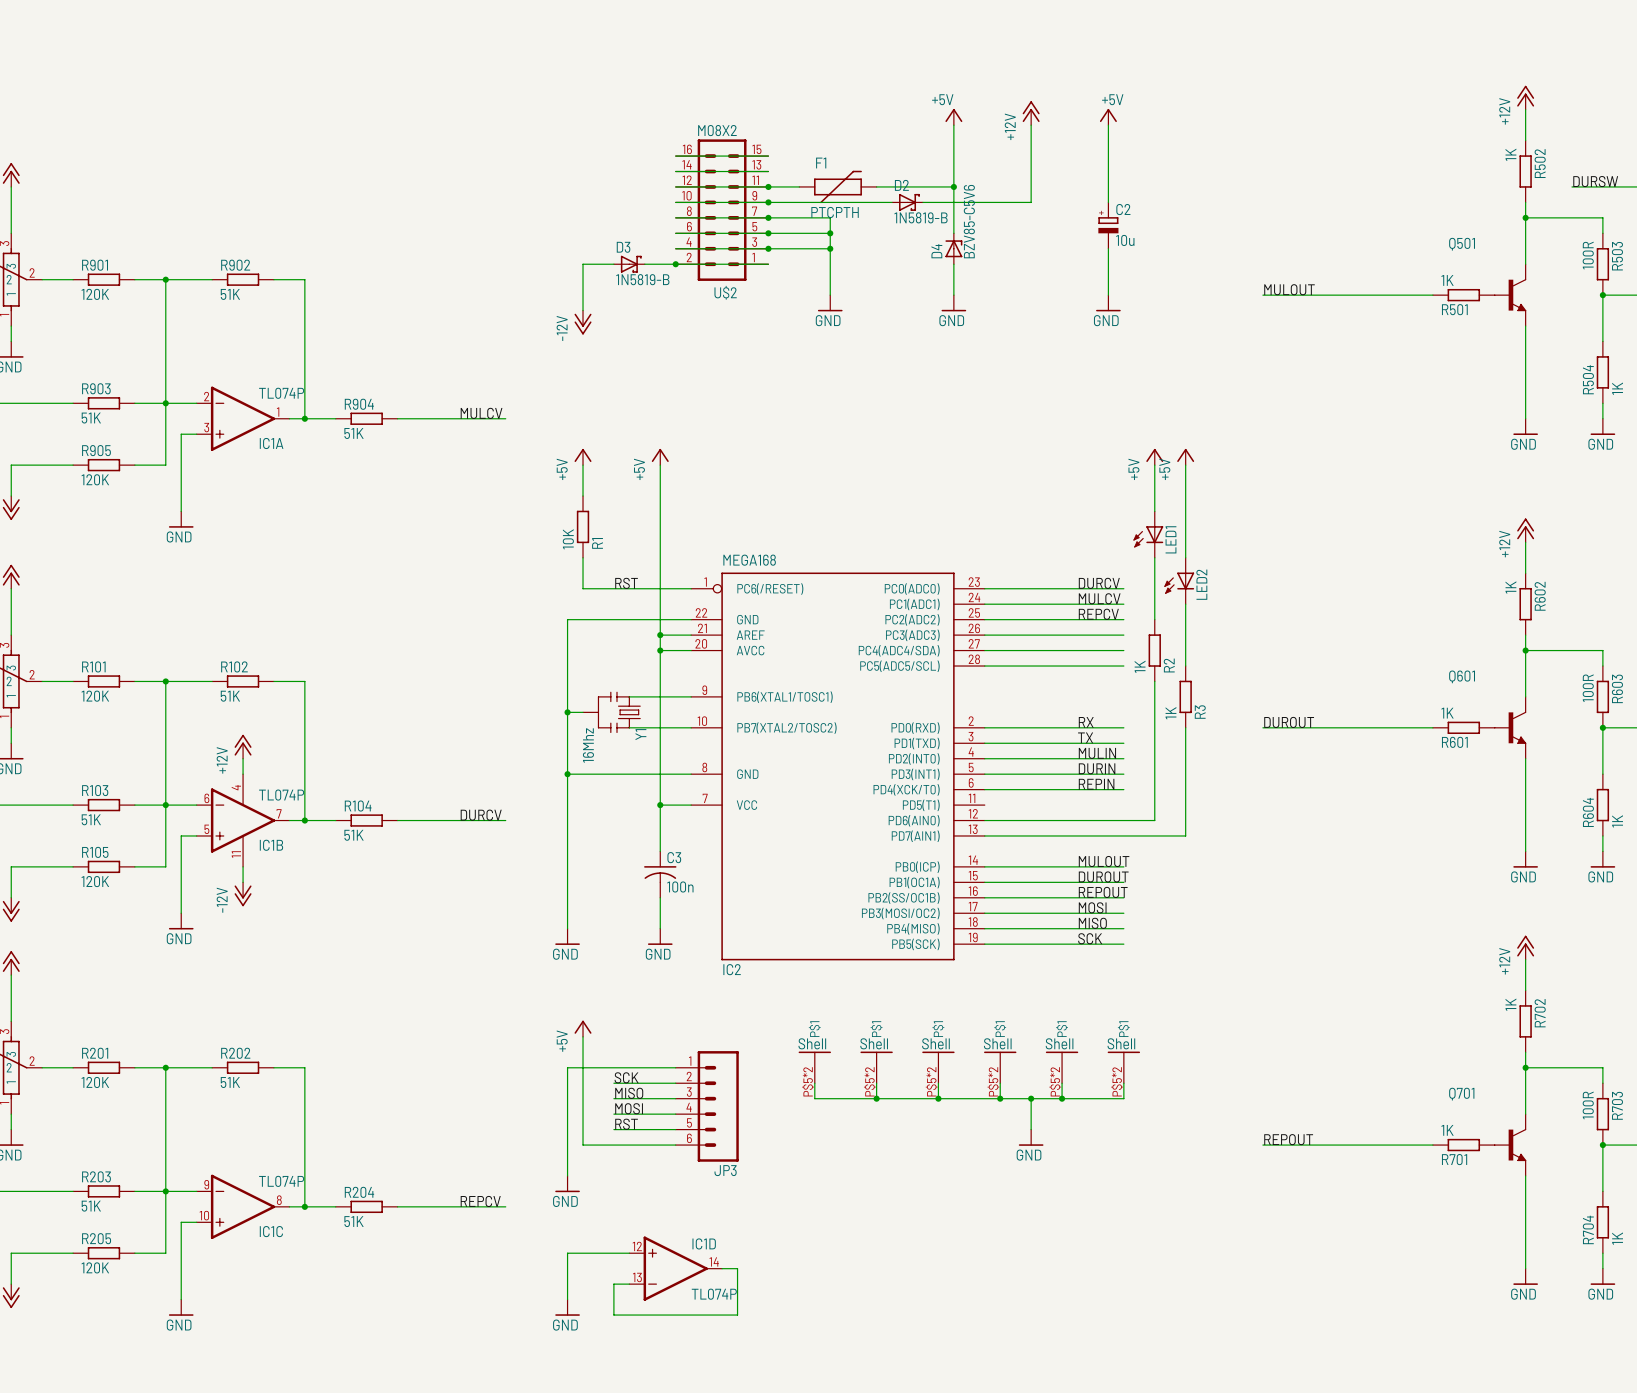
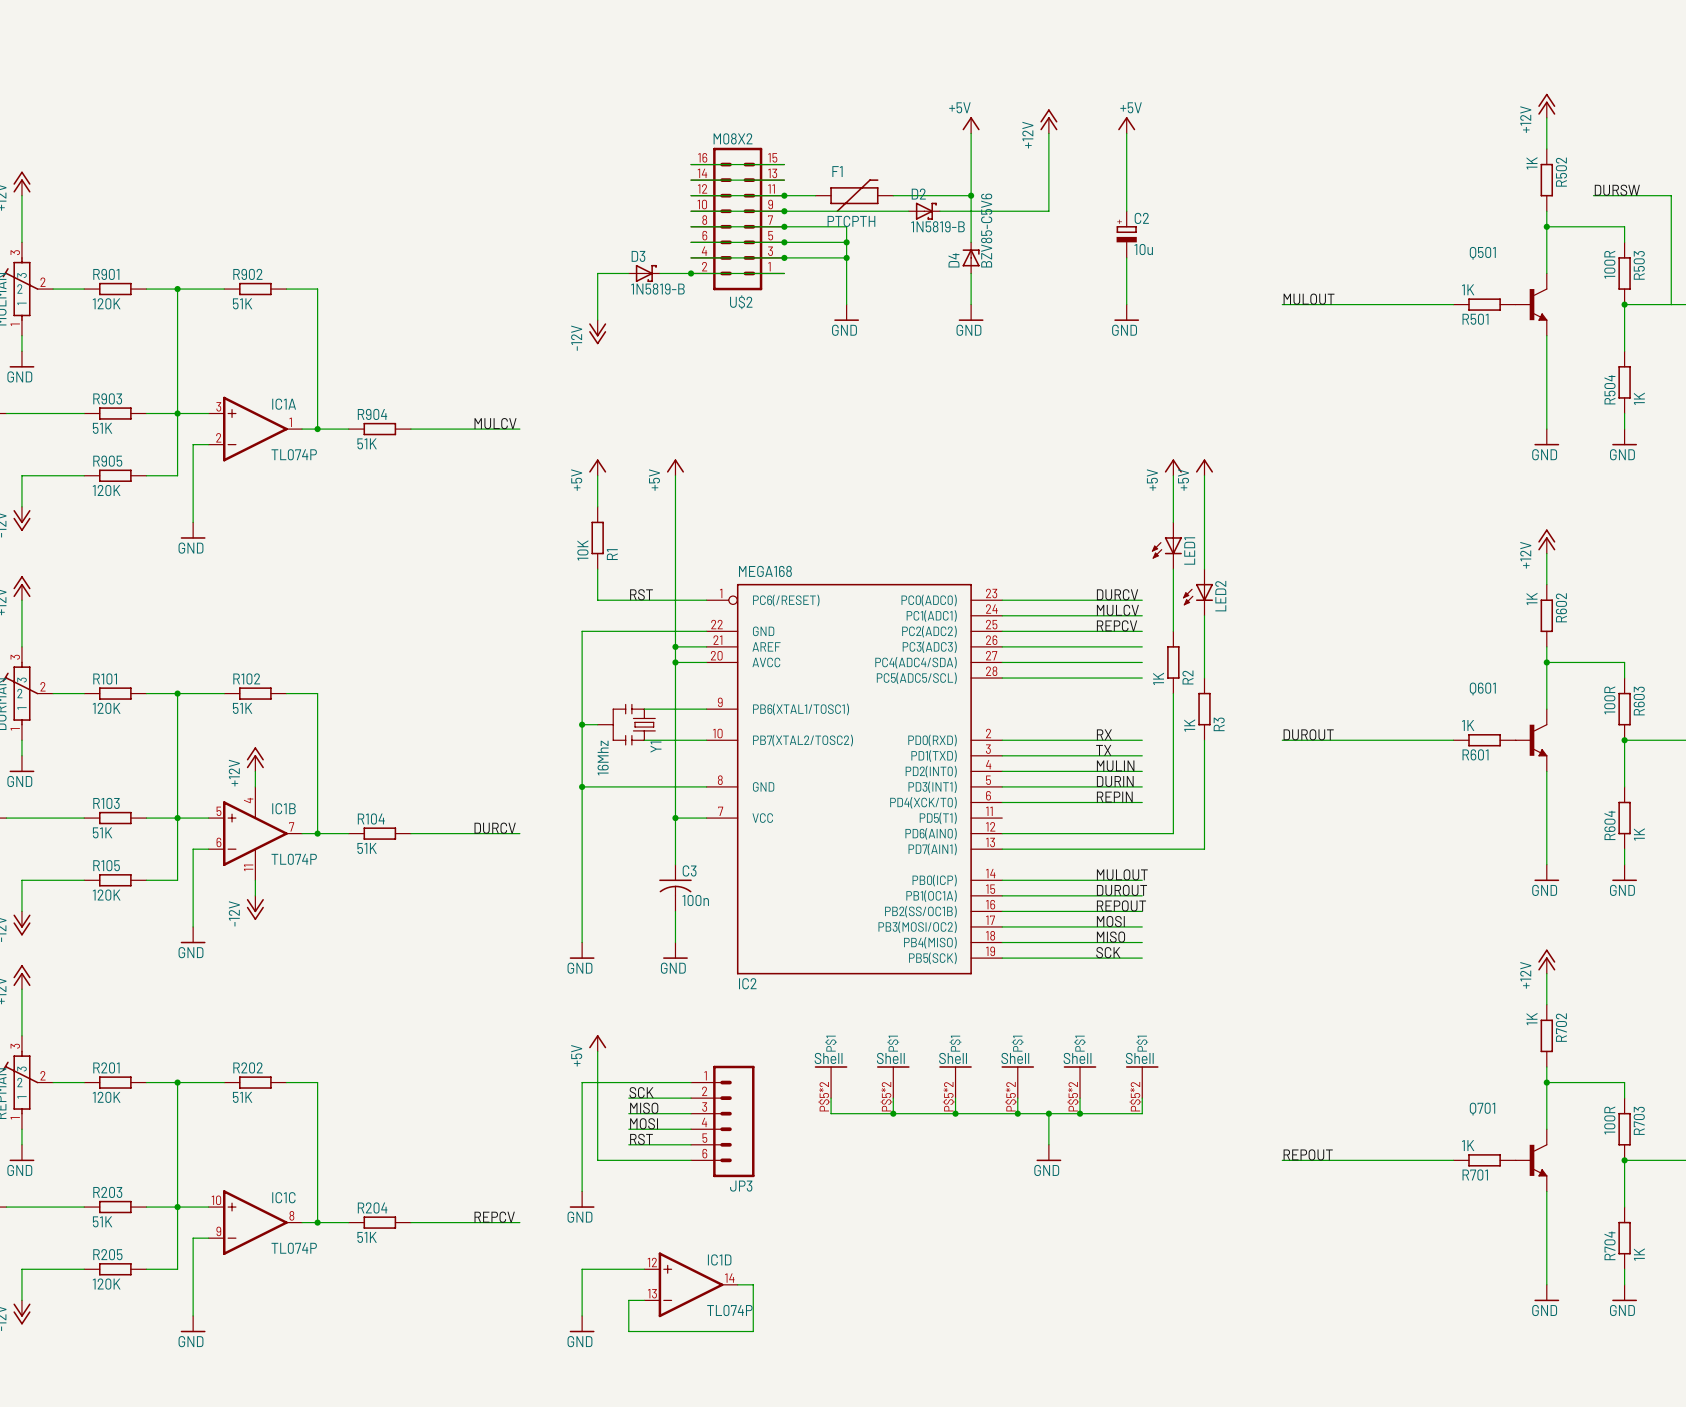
IC1A flip: as is (243, 418) -> up-down (255, 429)
IC1B flip: as is (243, 820) -> up-down (255, 833)
IC1C flip: as is (243, 1206) -> up-down (255, 1222)

